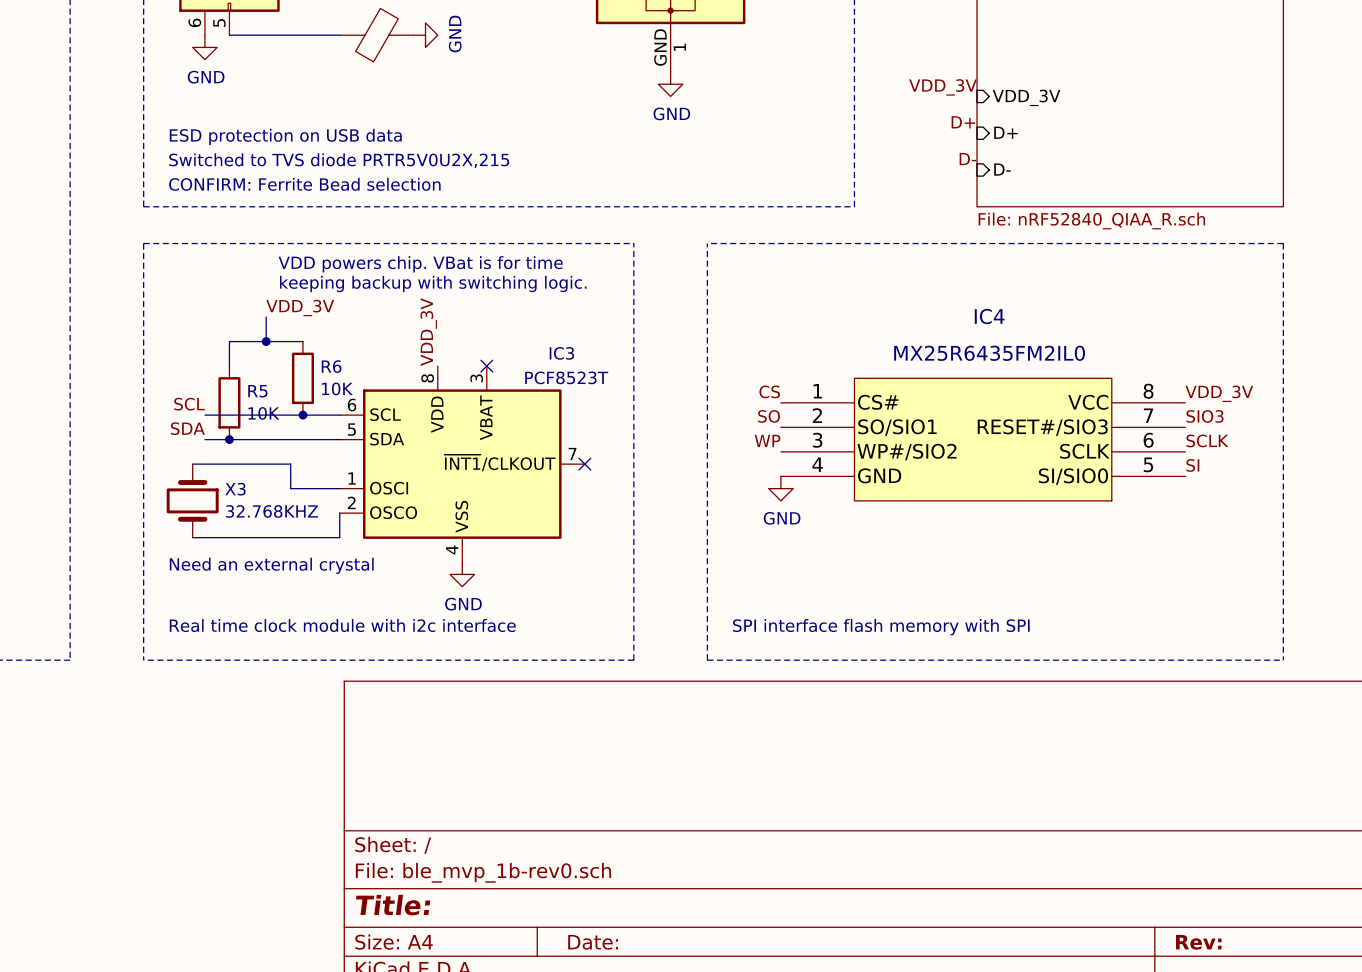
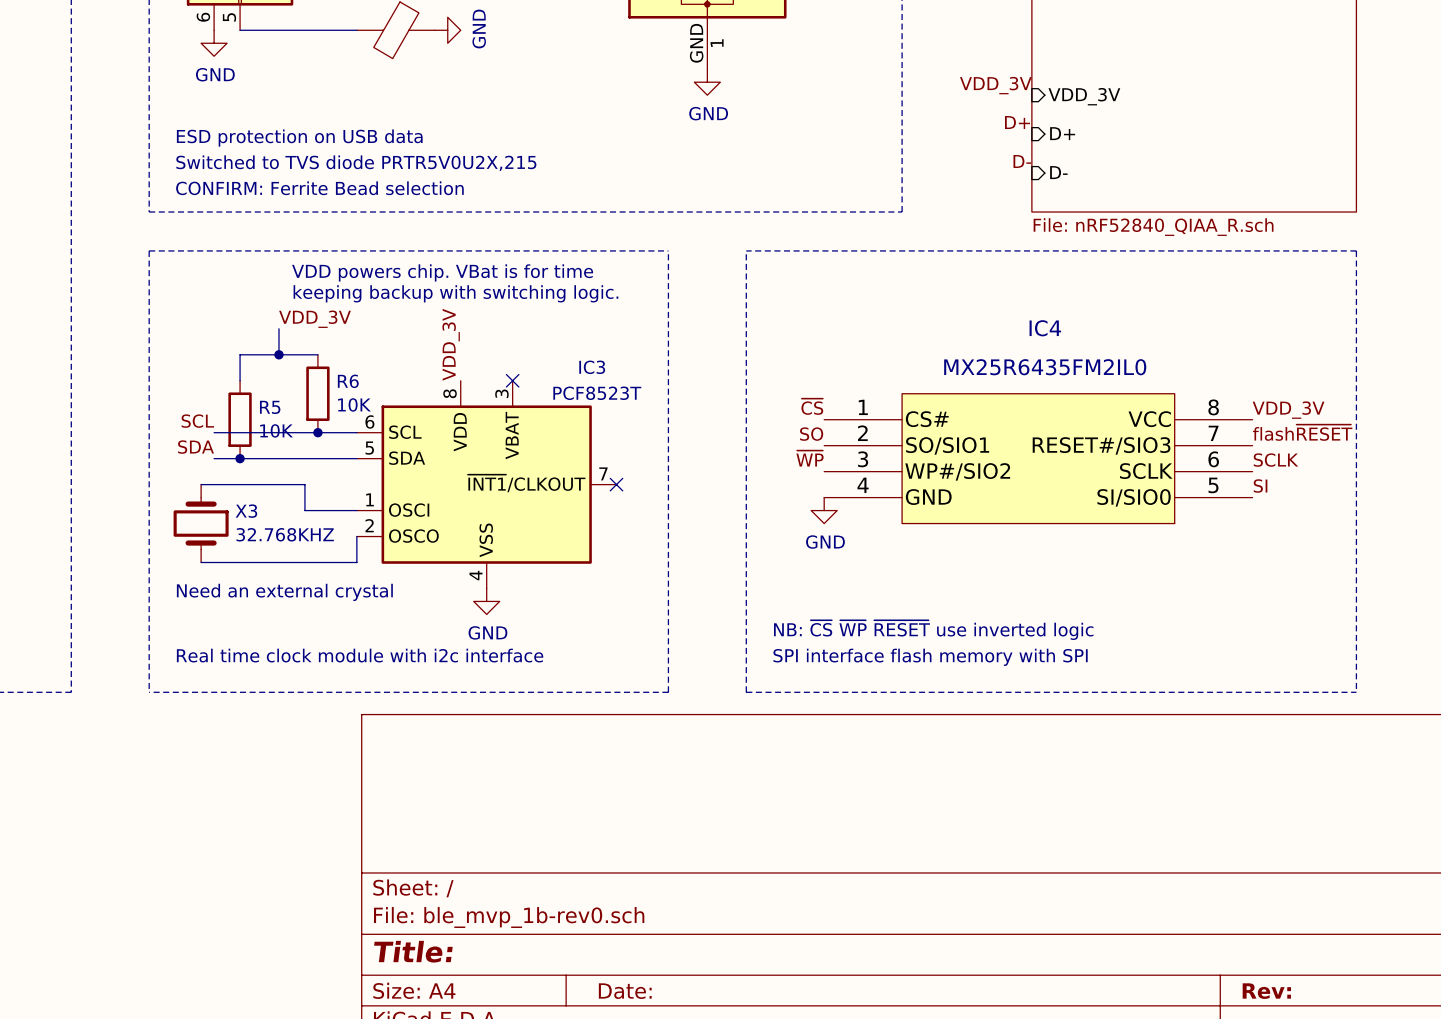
label: CS (769, 391) -> ~{CS} (812, 406)
label: SIO3 (1204, 416) -> flash~{RESET} (1302, 432)
label: WP (767, 440) -> ~{WP} (810, 458)
text: none -> NB: ~{CS} ~{WP} ~{RESET} use inverted logic (933, 630)

